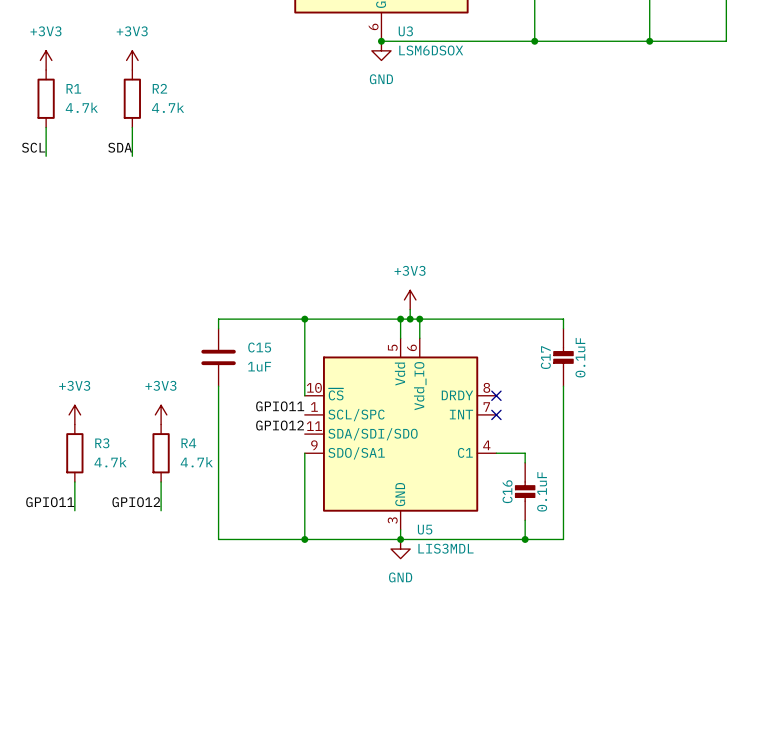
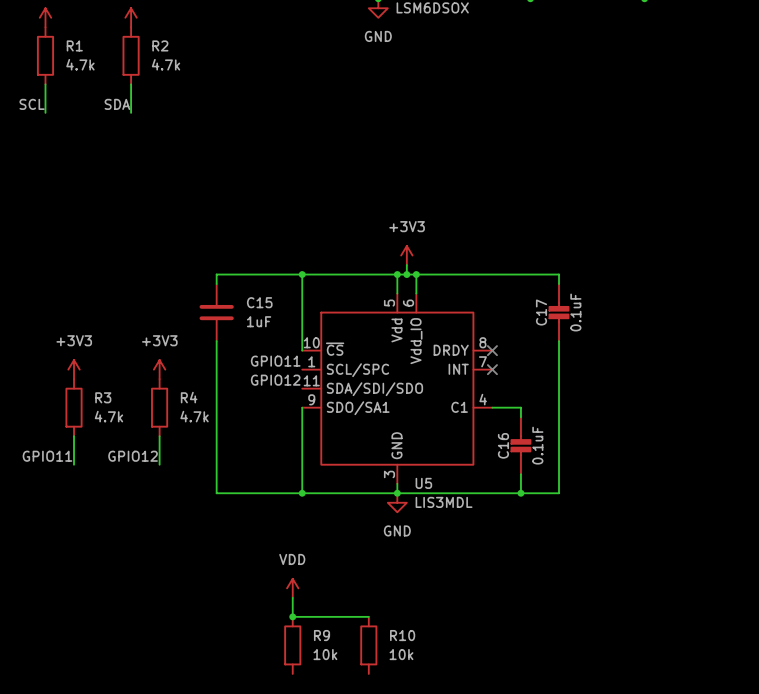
power symbol: none -> VDD (292, 588)
wire: none -> (292, 597) (292, 616) (368, 616)
junction: none -> (292, 616)
R9: none -> 10k (292, 645)
R10: none -> 10k (368, 645)

